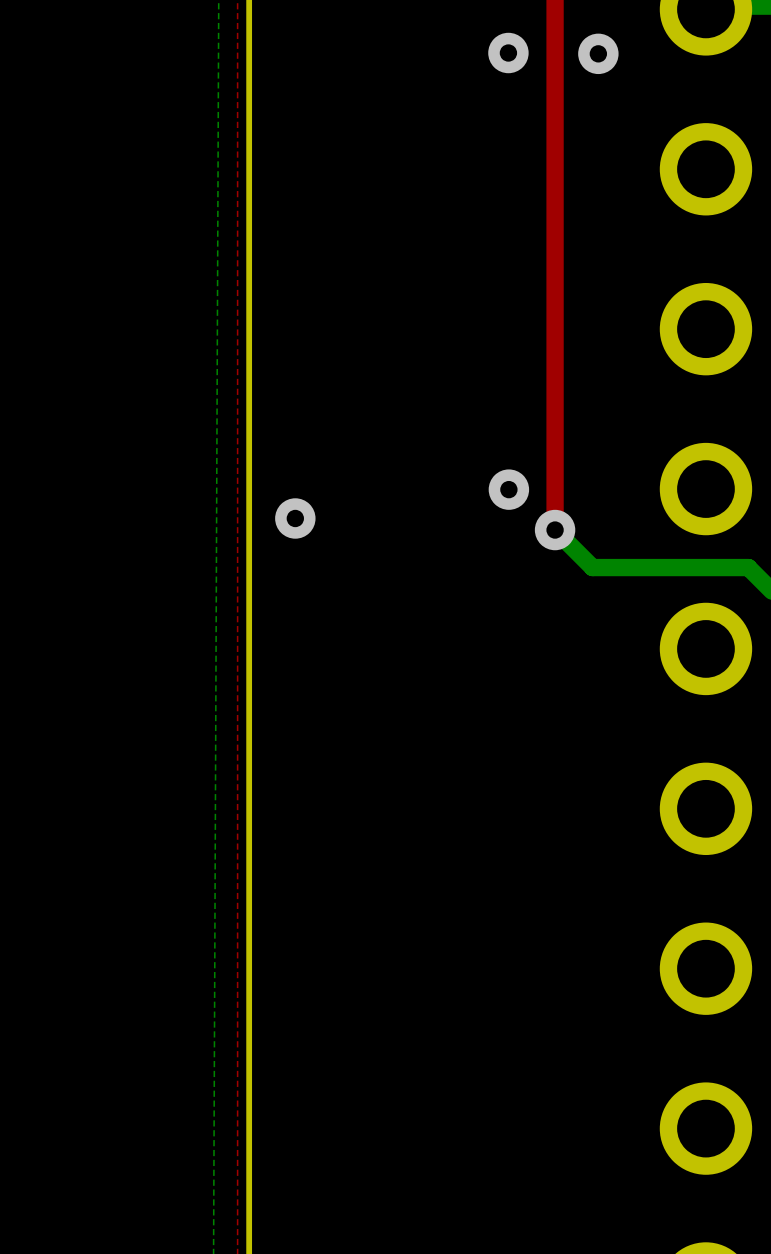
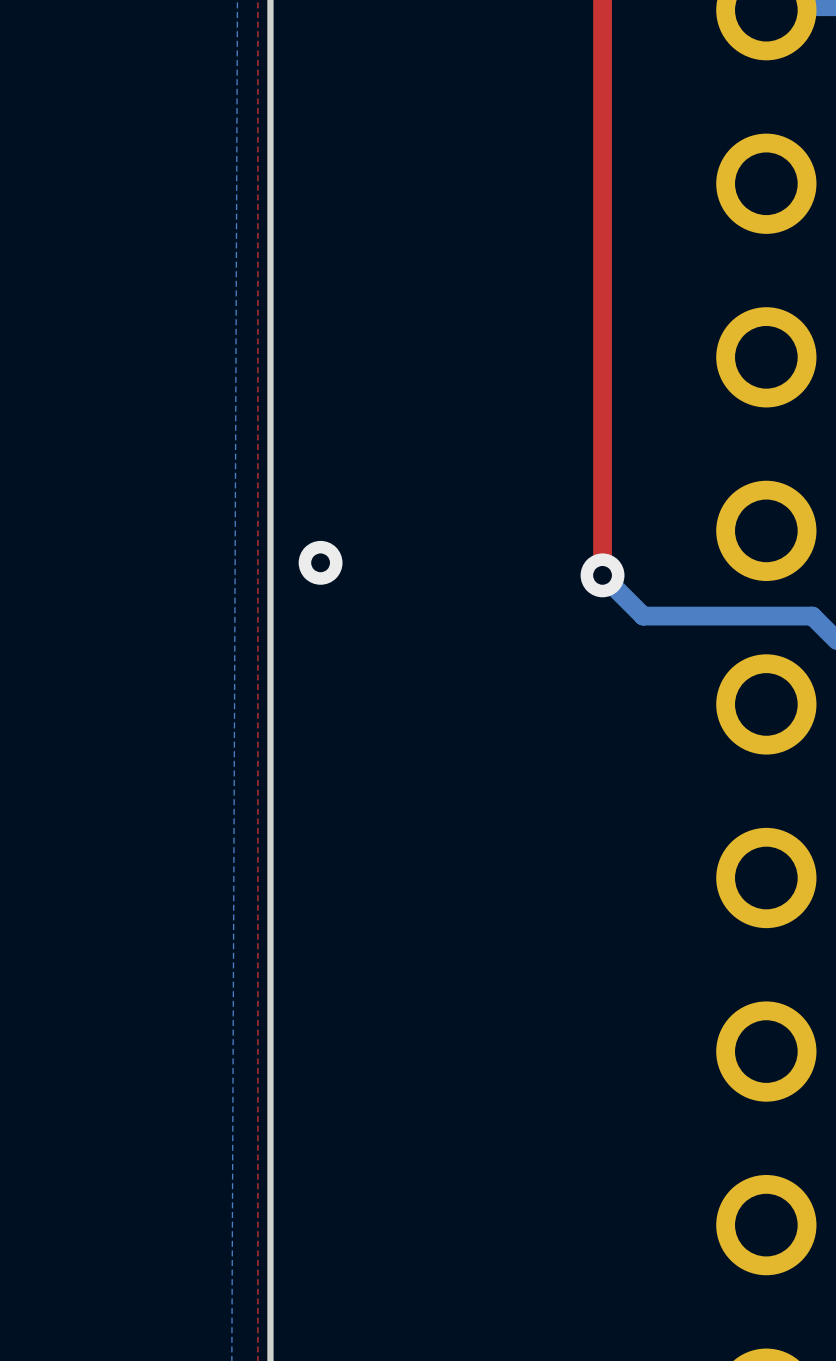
via: (508, 53) -> none
via: (598, 53) -> none
via: (508, 489) -> none

